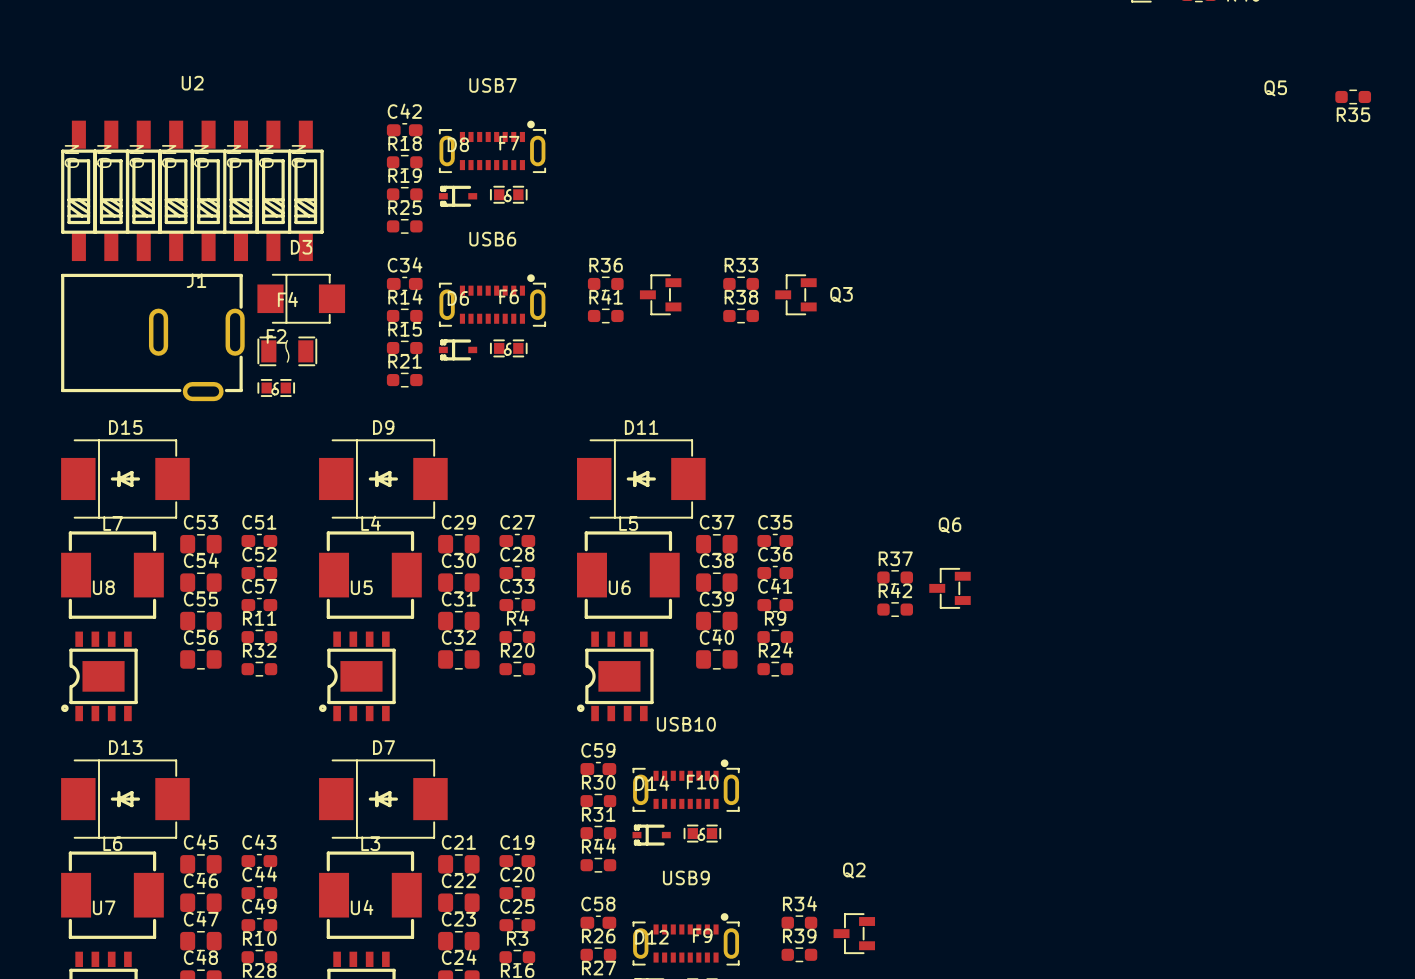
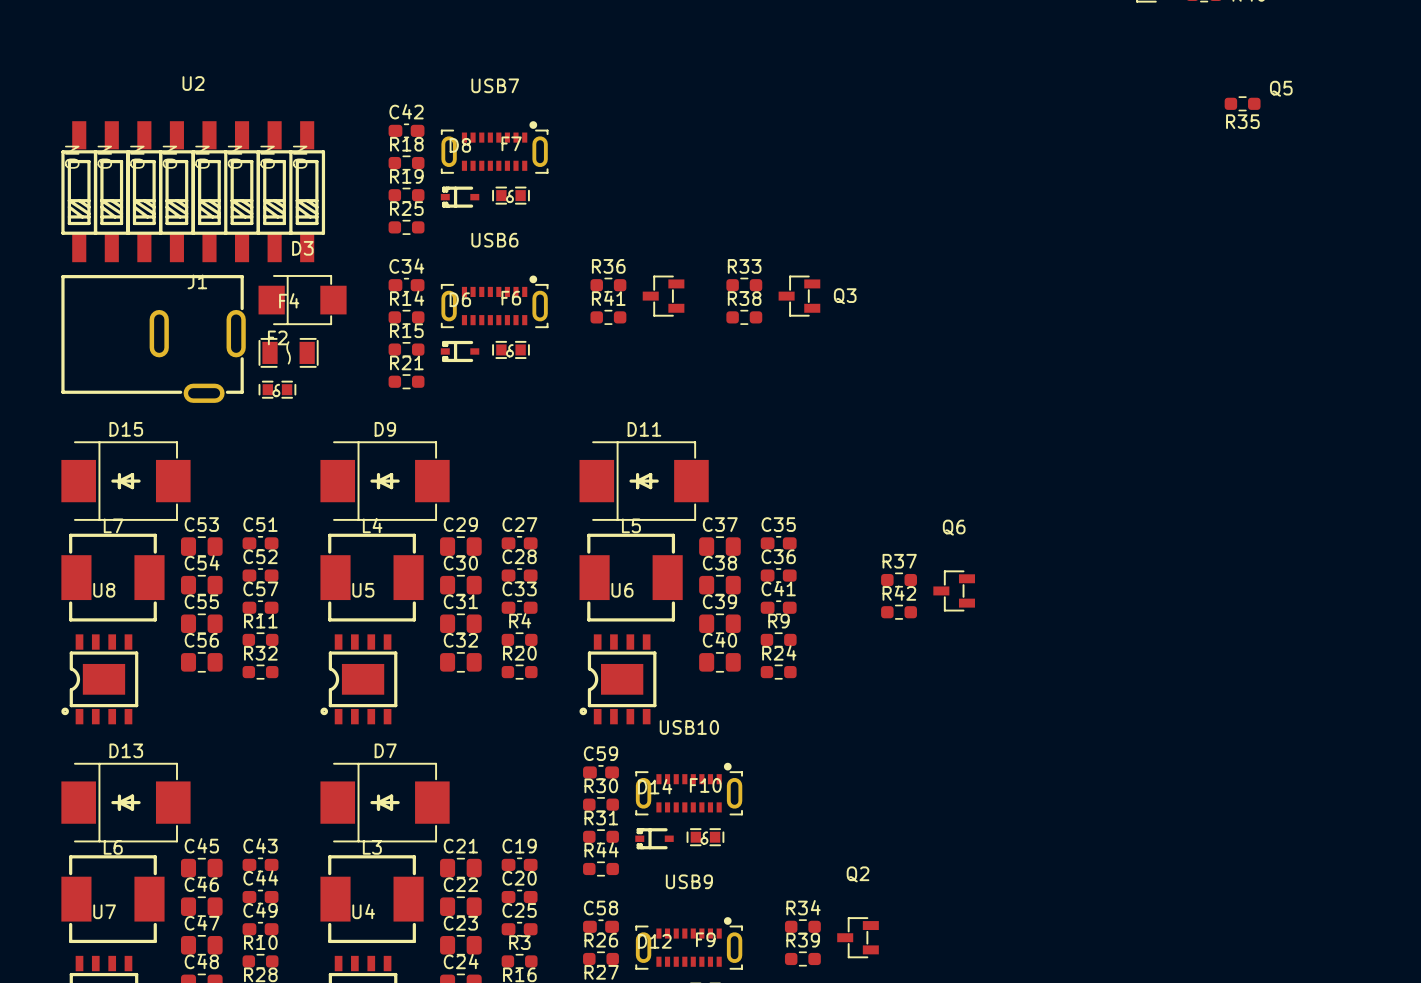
R35 position: (1353, 96) -> (1242, 103)

